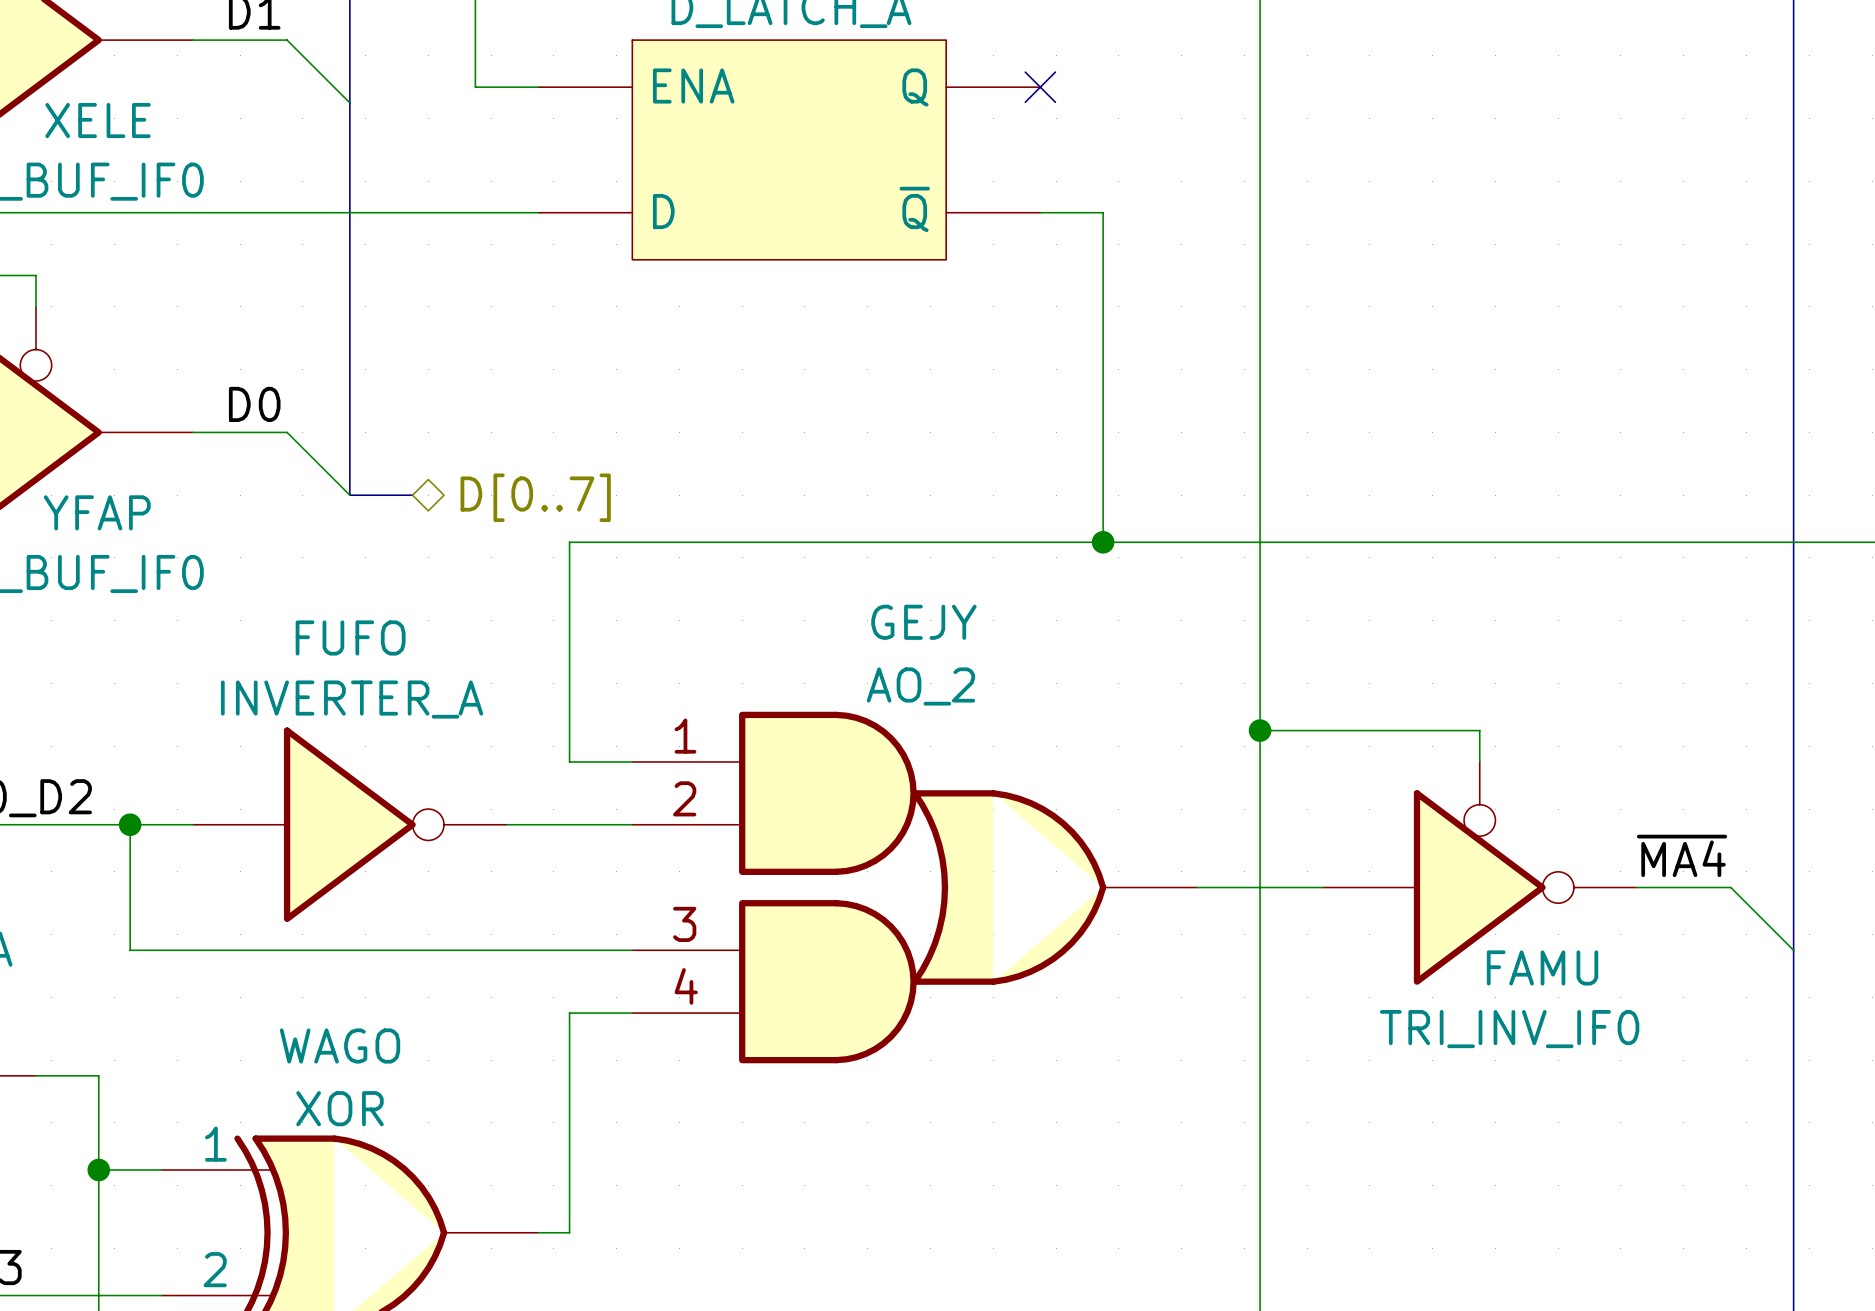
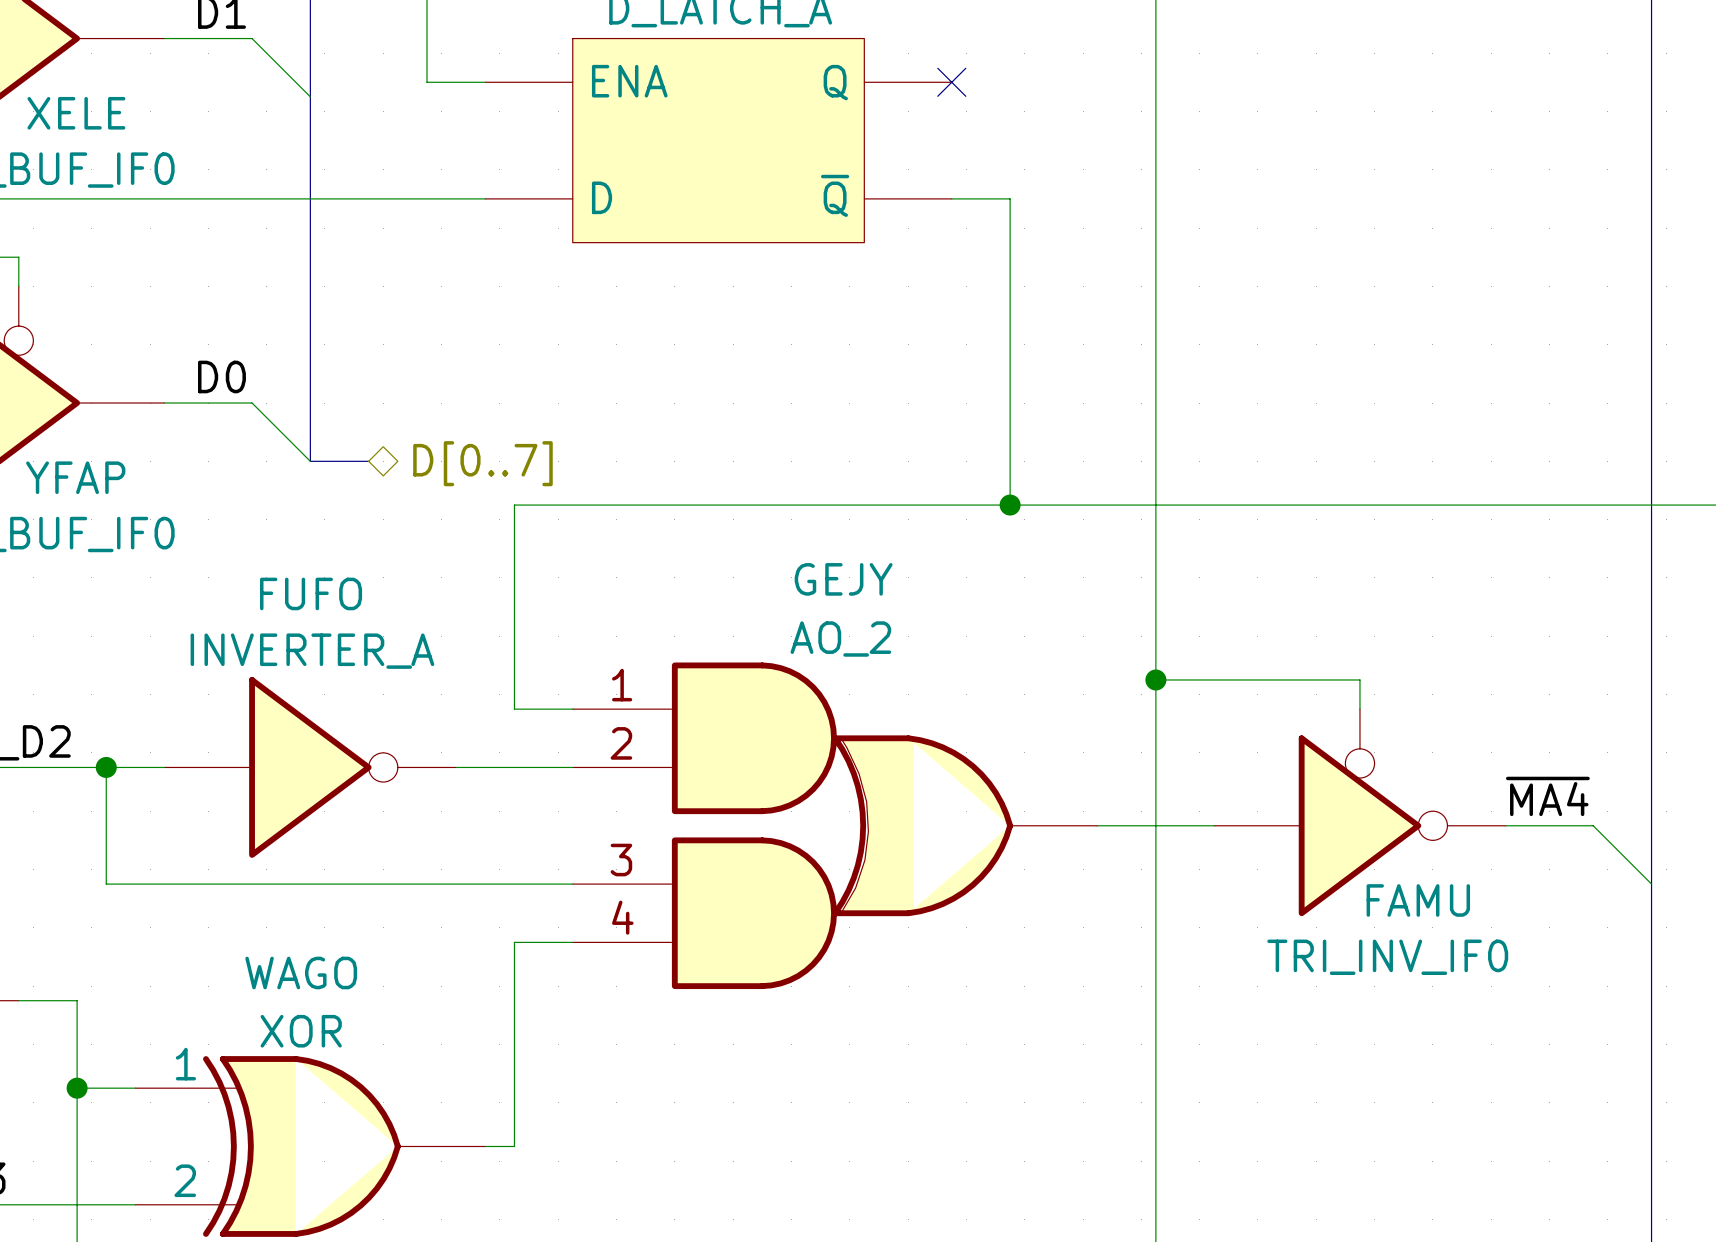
GEJY symbol: [632, 711, 1198, 1064] -> [572, 662, 1098, 990]

